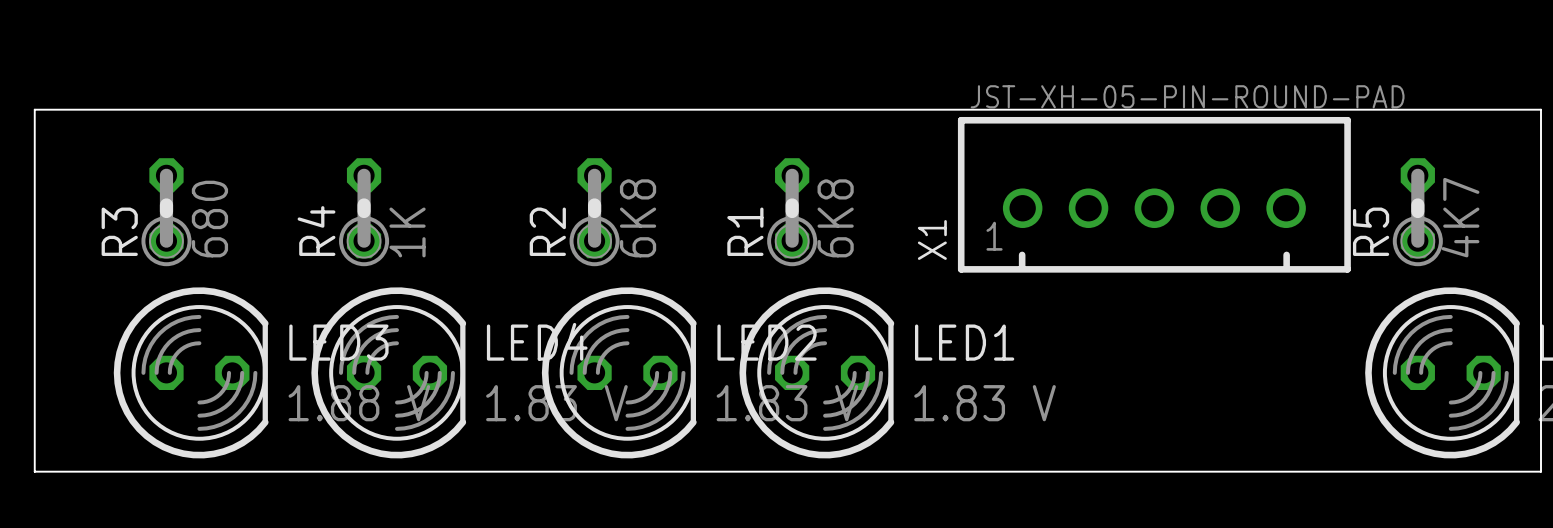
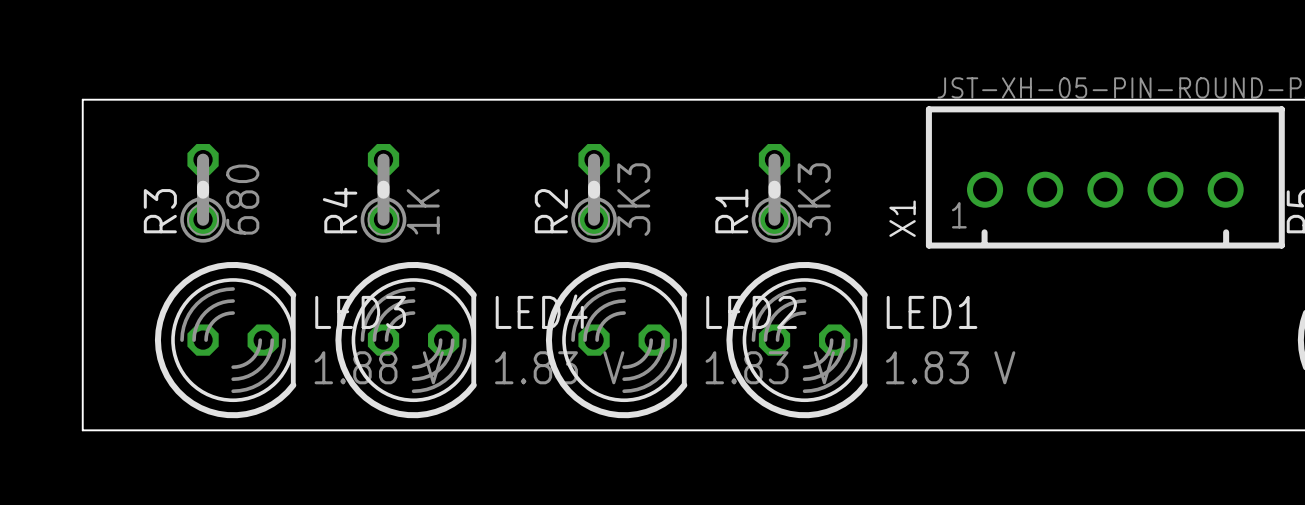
R2 value: 6K8 (638, 218) -> 3K3 (633, 199)
R1 value: 6K8 (835, 218) -> 3K3 (814, 199)

